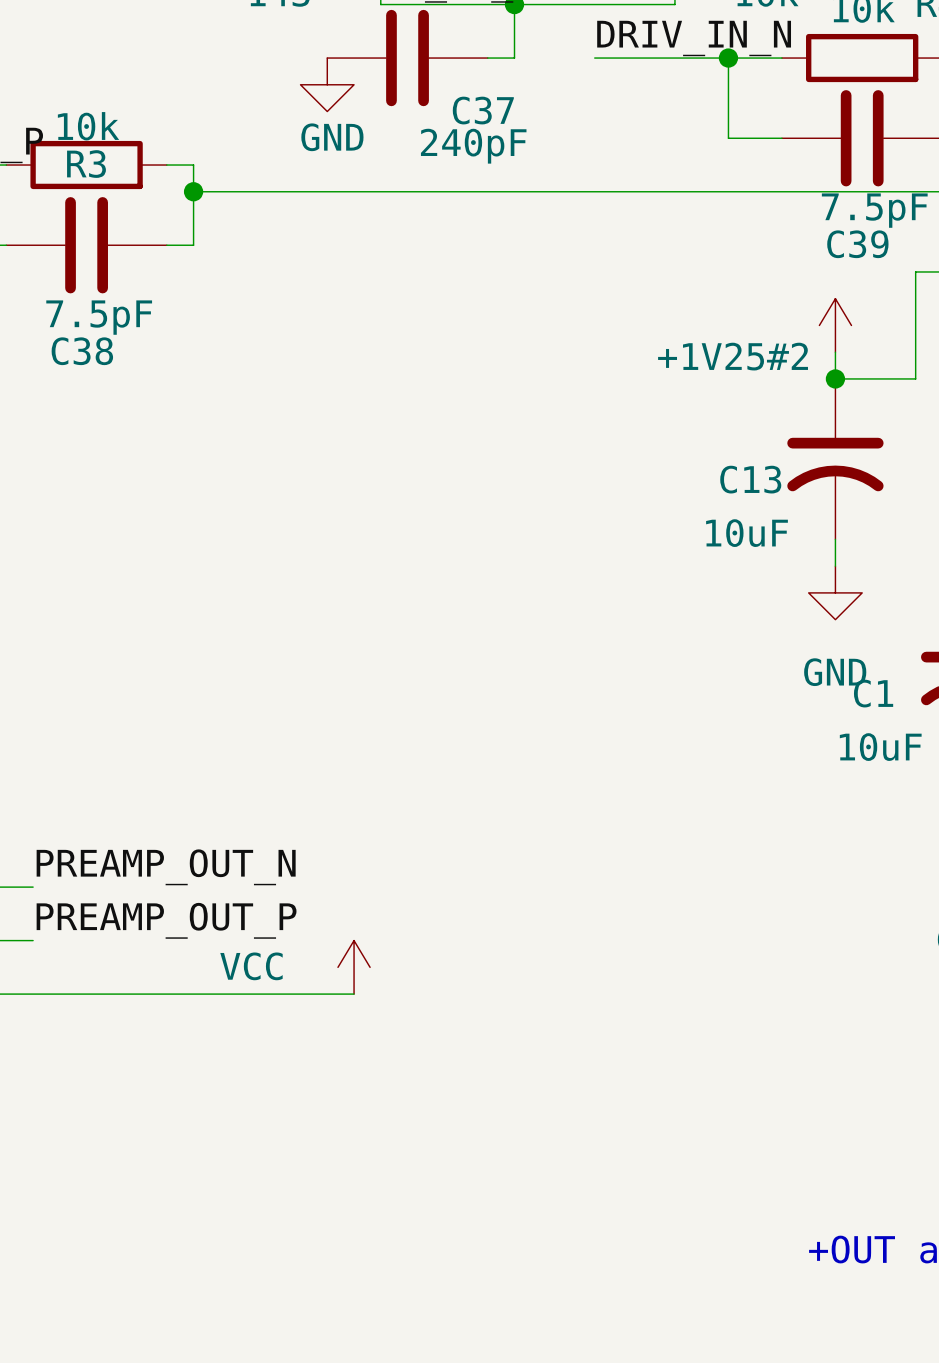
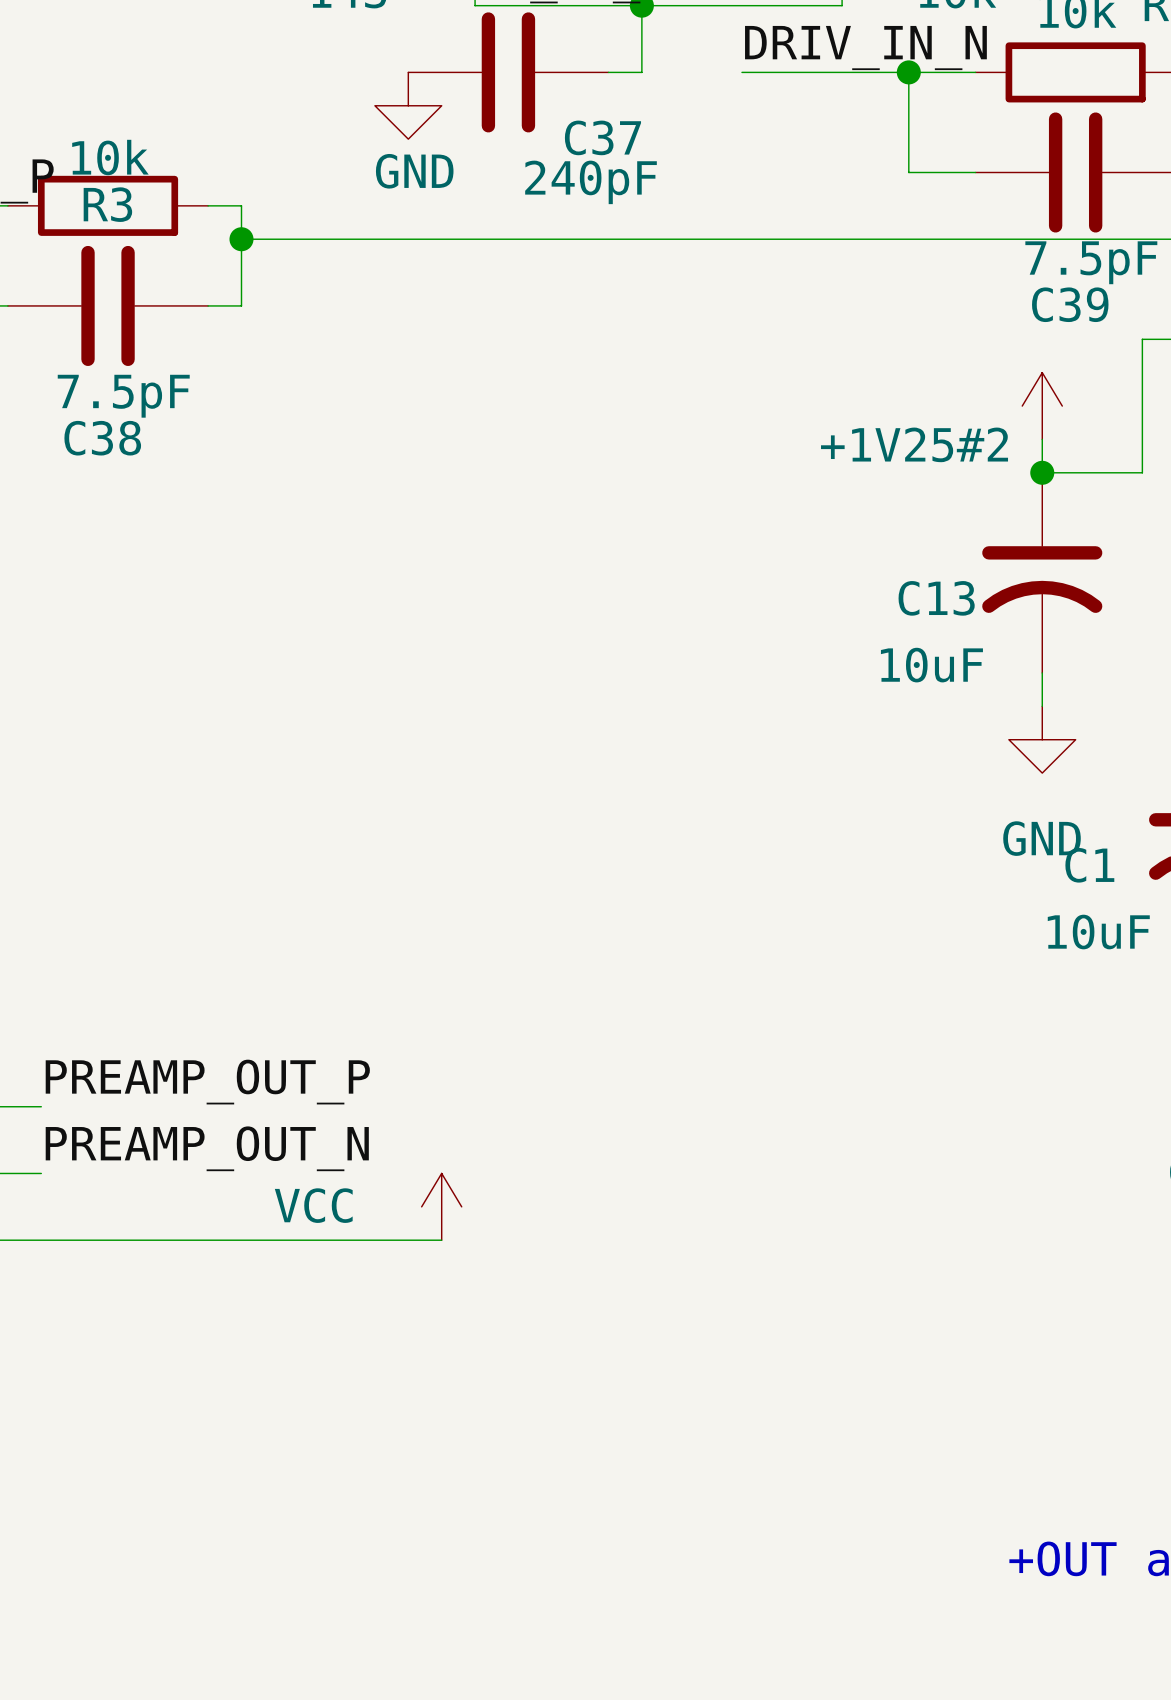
label: PREAMP_OUT_N (166, 867) -> PREAMP_OUT_P (207, 1082)
label: PREAMP_OUT_P (166, 920) -> PREAMP_OUT_N (207, 1148)

